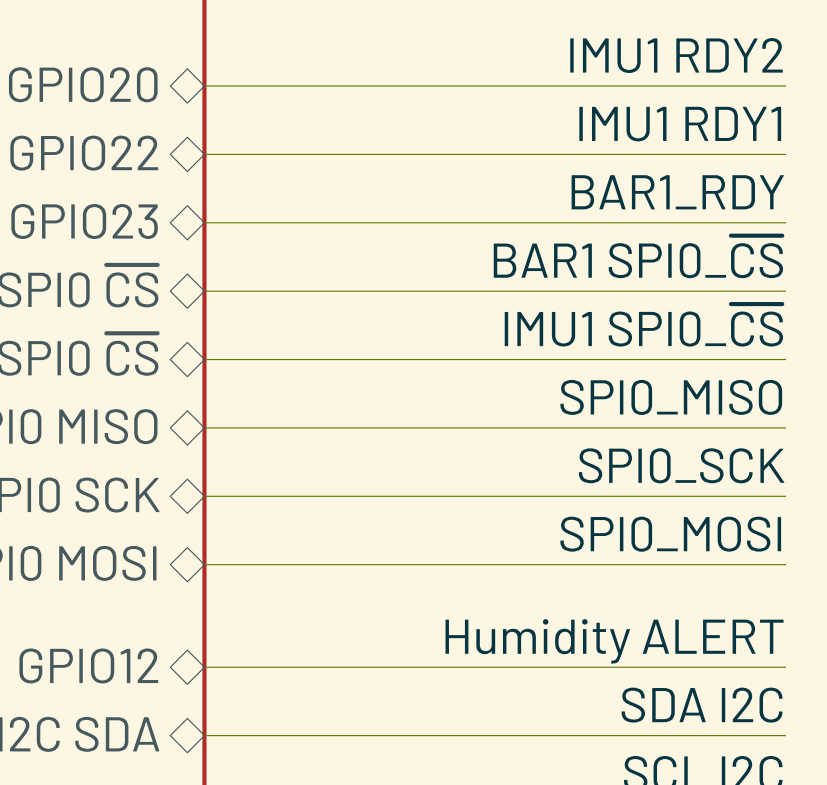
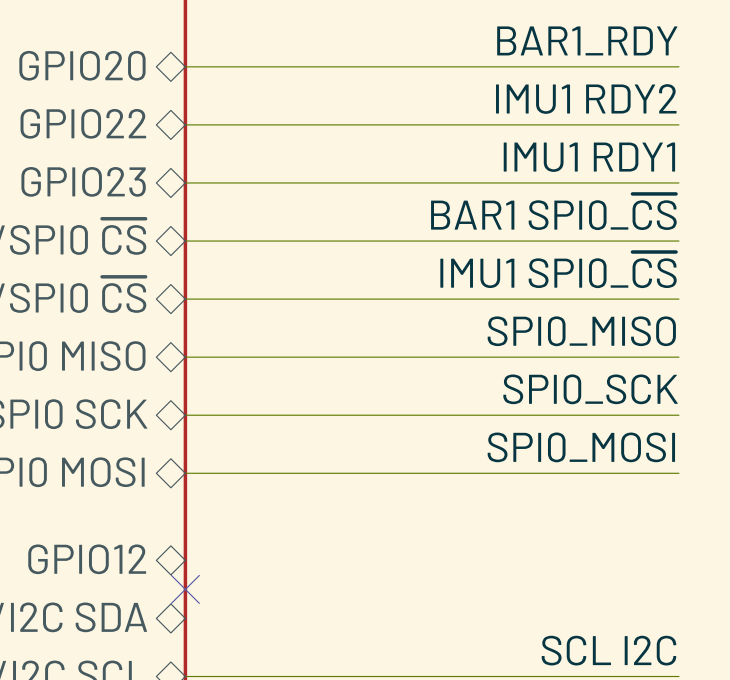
label: IMU1 RDY2 (676, 55) -> BAR1_RDY (587, 40)
label: IMU1 RDY1 (680, 124) -> IMU1 RDY2 (586, 99)
label: BAR1_RDY (677, 192) -> IMU1 RDY1 (589, 157)
label: Humidity ALERT (614, 641) -> none
wire: (204, 667) (785, 667) -> none
no-connect mark: none -> (185, 589)
label: SDA I2C (702, 705) -> none
wire: (204, 735) (785, 735) -> none

